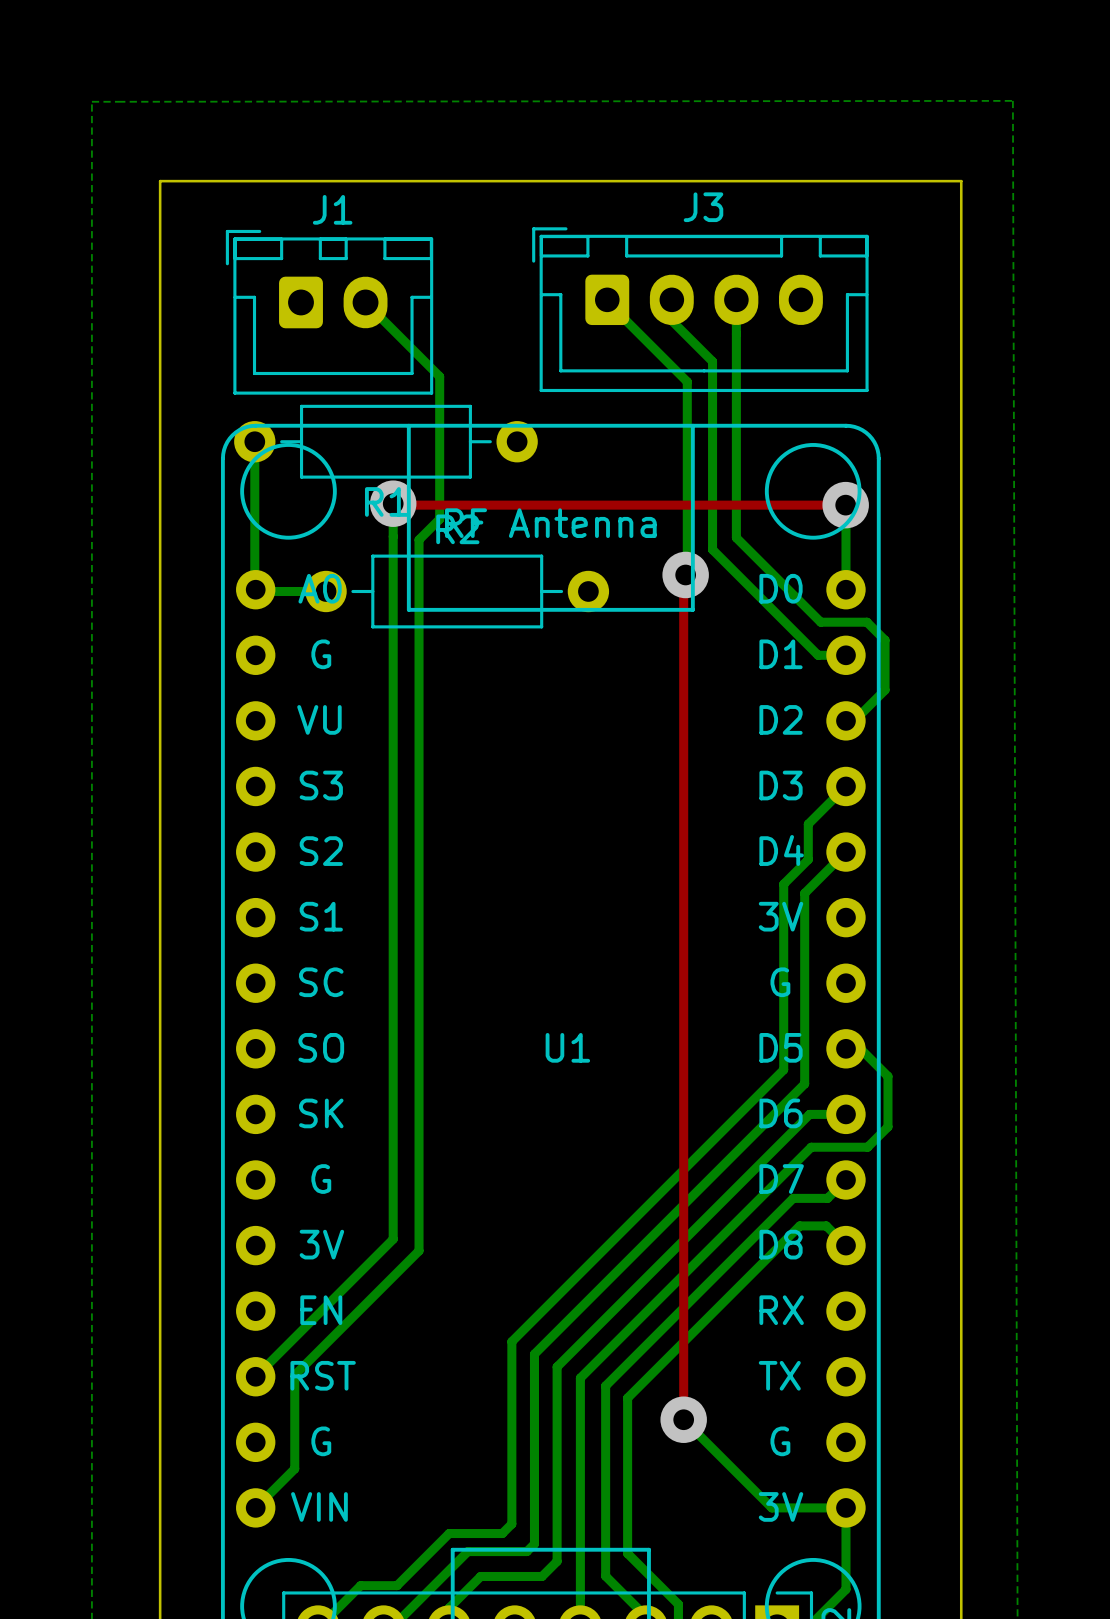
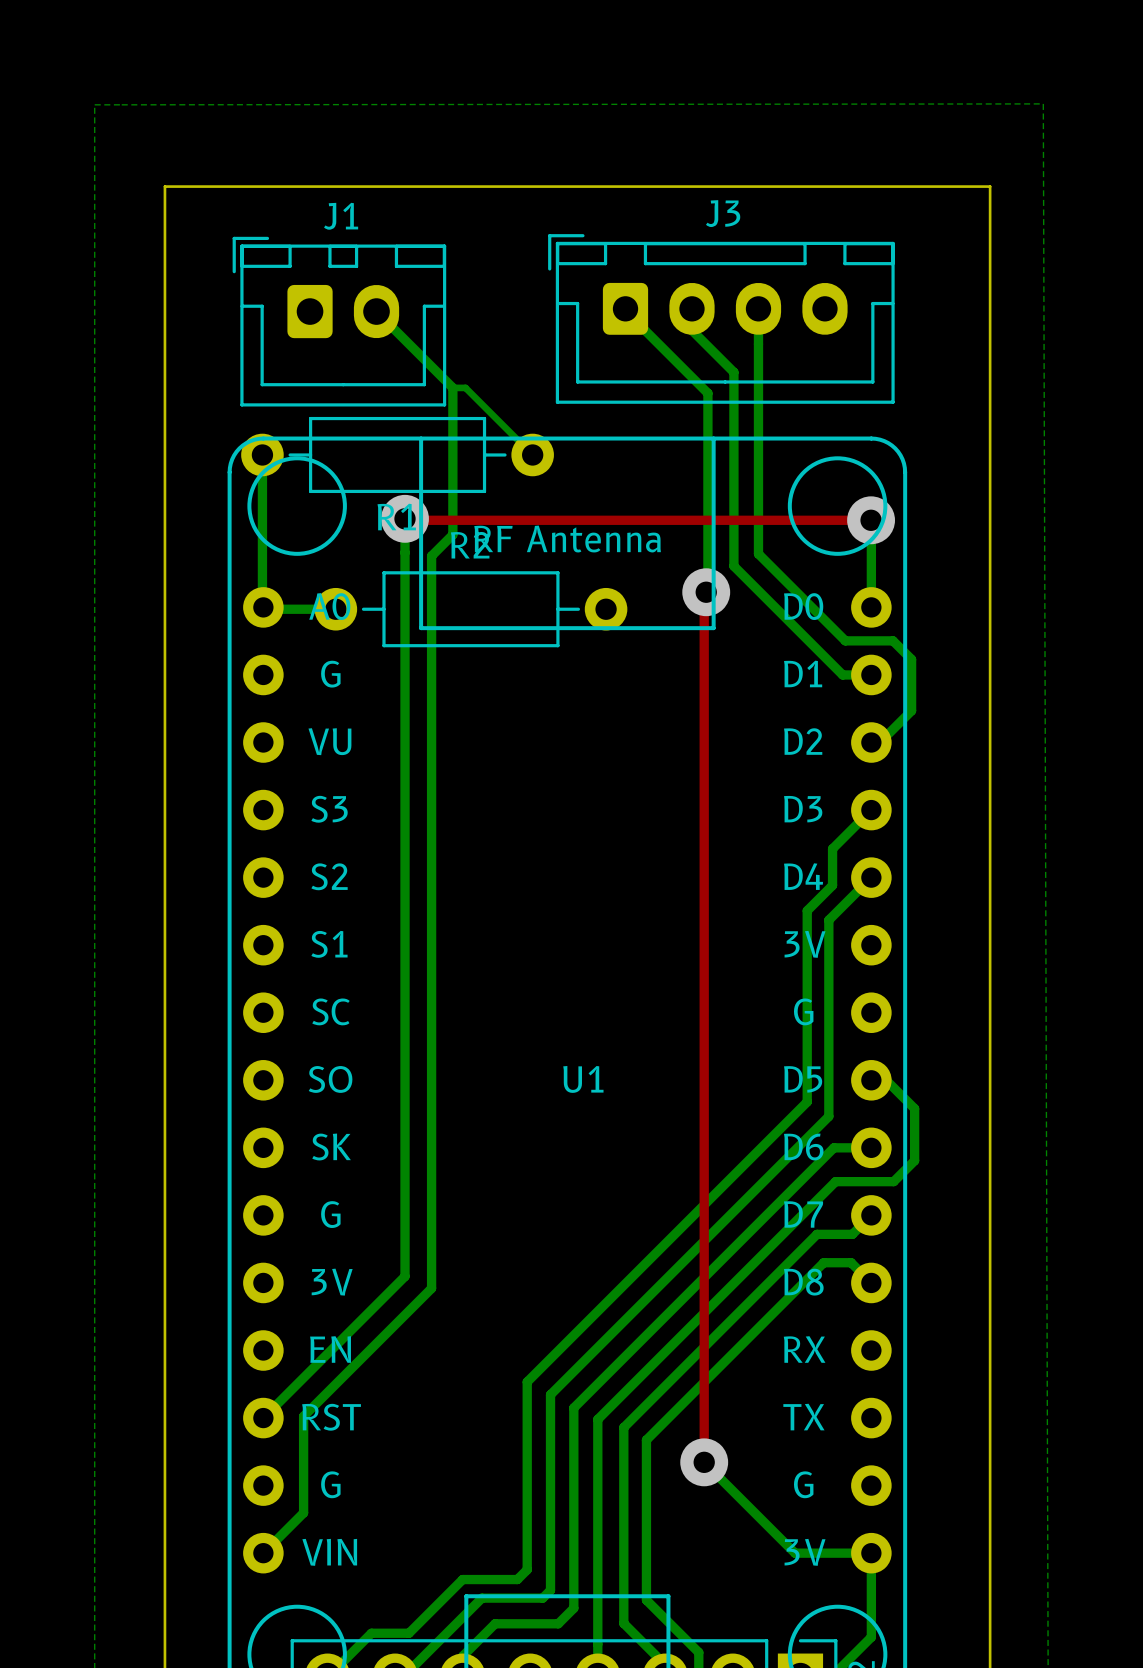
bottom track: none -> (452, 387) (465, 387) (532, 454)

